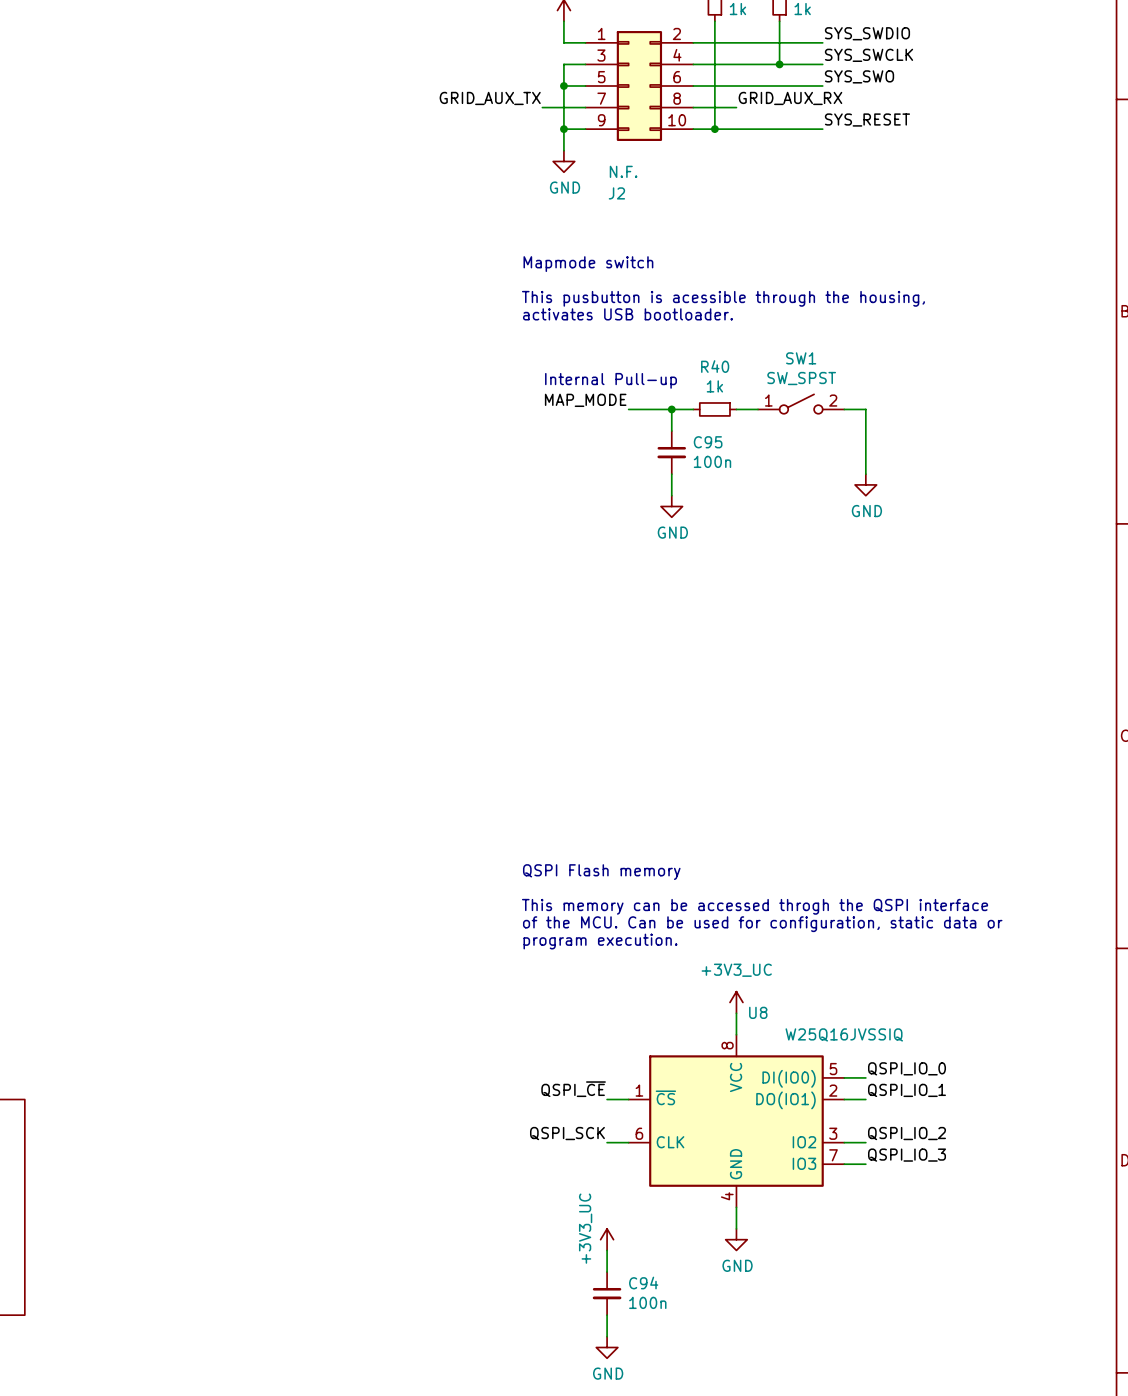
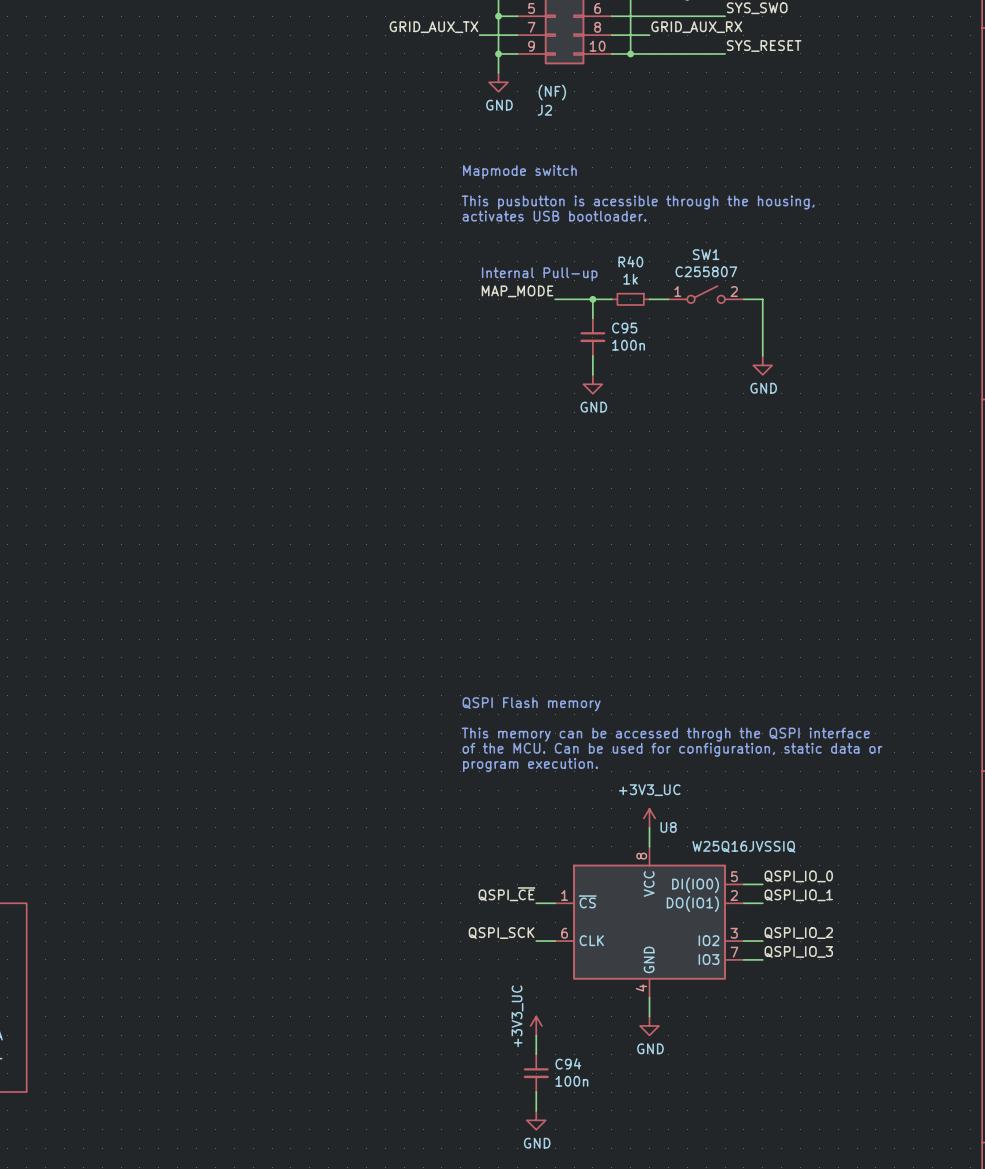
J2 value: N.F. (623, 171) -> (NF) (552, 92)
SW1 value: SW_SPST (801, 378) -> C255807 (706, 271)

